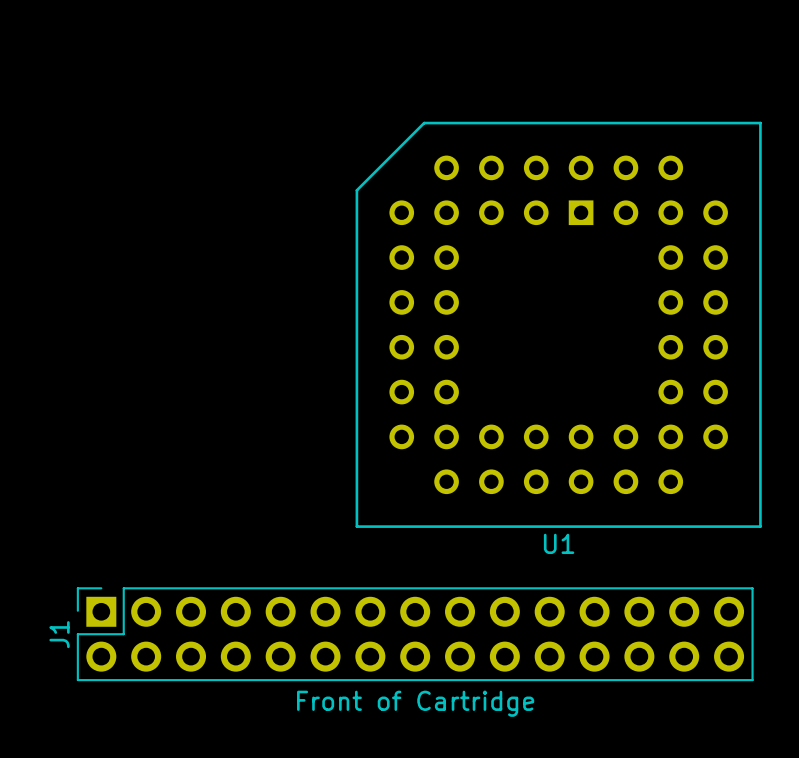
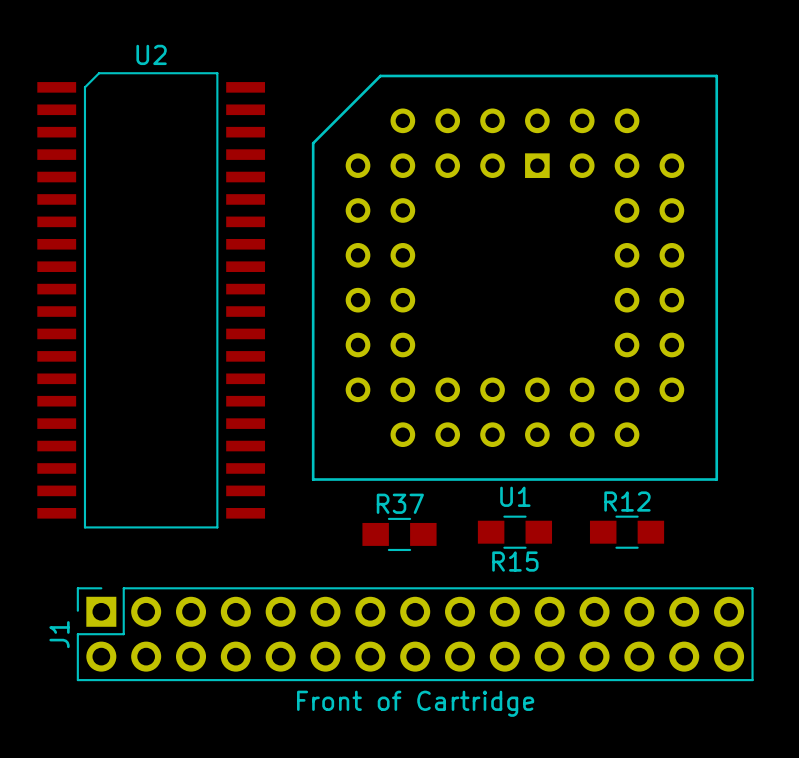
U2: none -> (151, 300)
U1 position: (558, 324) -> (514, 277)
R15: none -> (514, 532)
R12: none -> (627, 532)
R37: none -> (399, 534)

